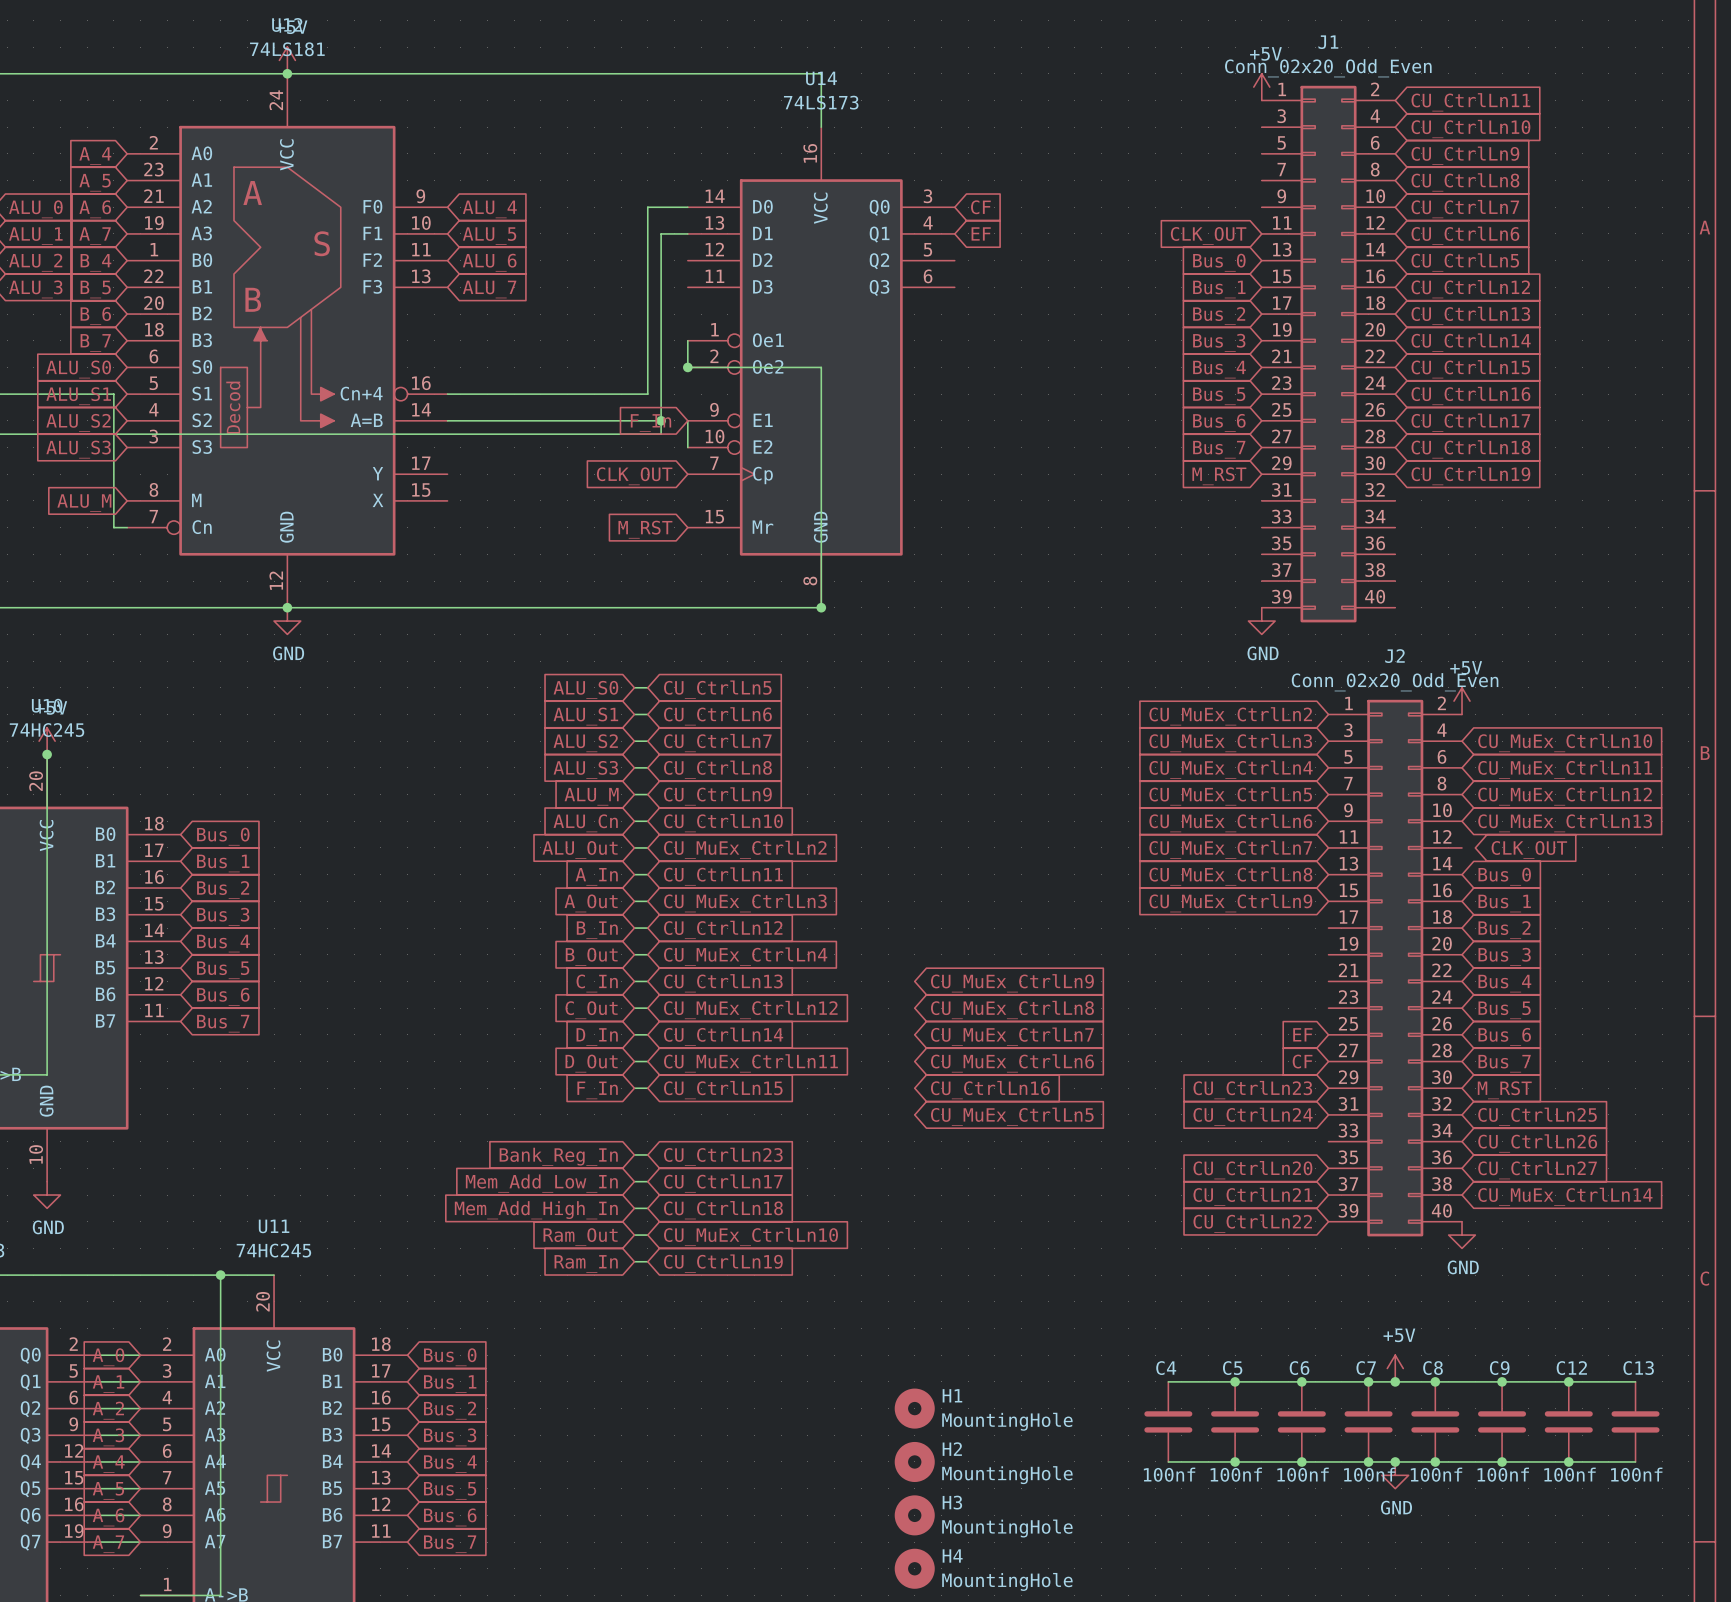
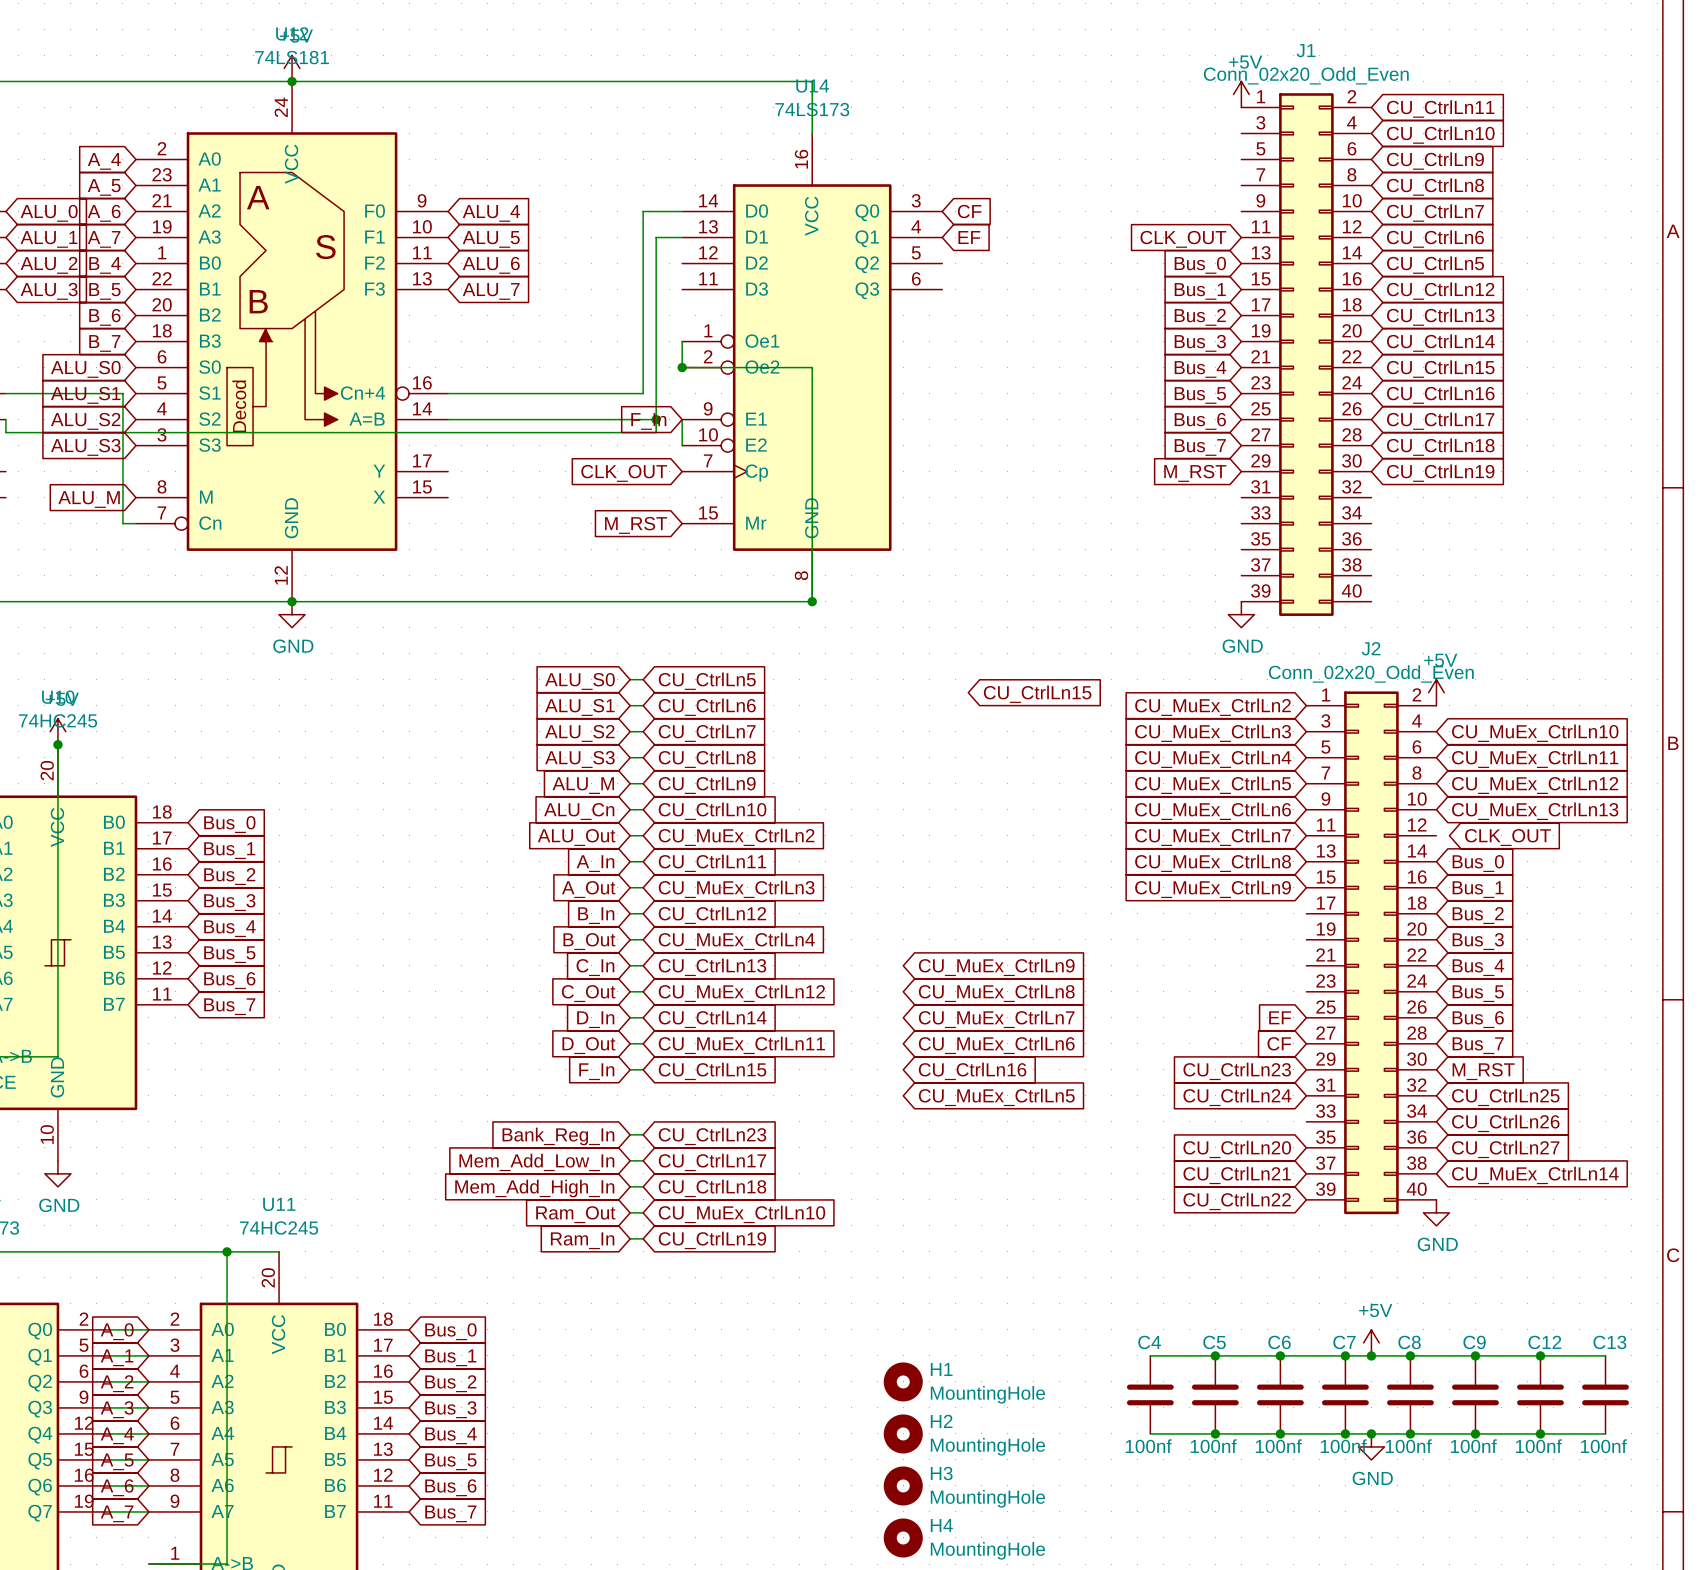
global label: none -> CU_CtrlLn15 (1037, 694)

